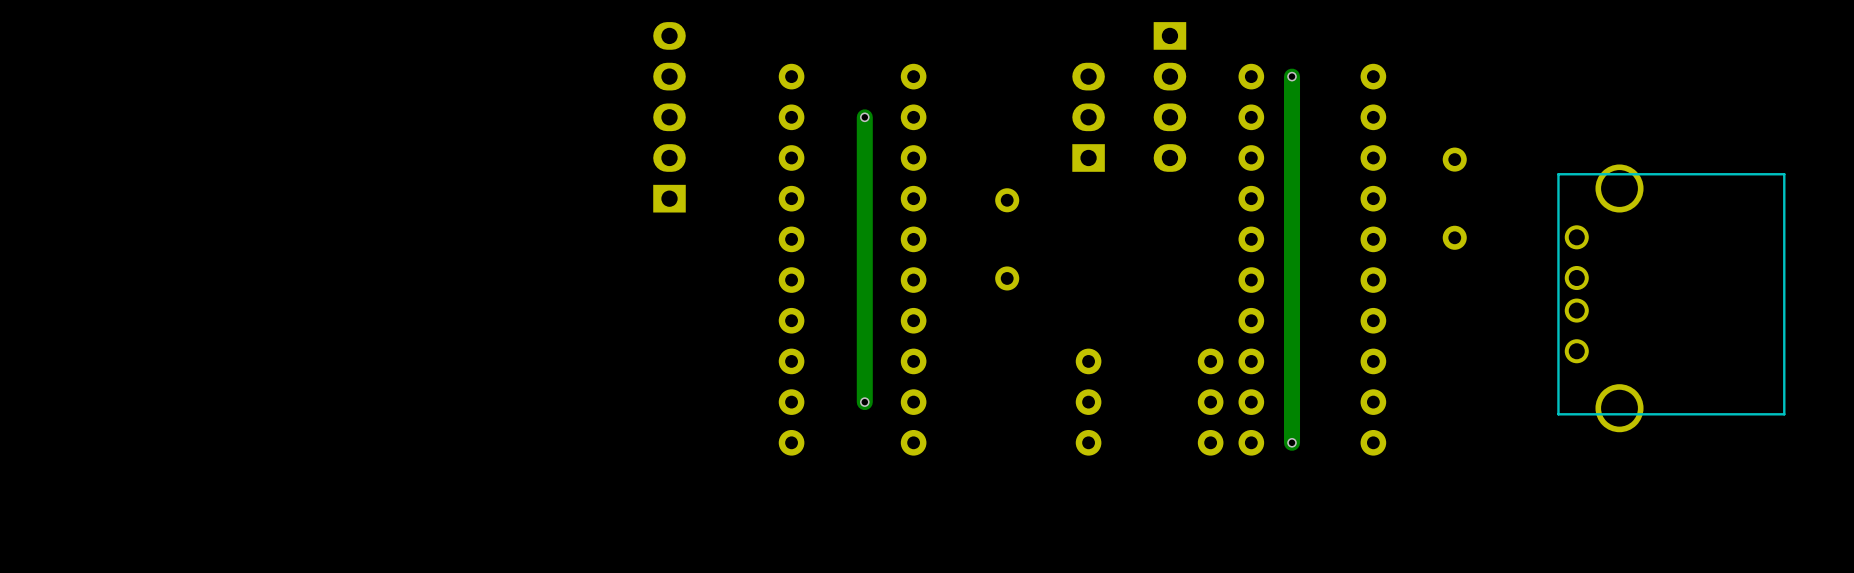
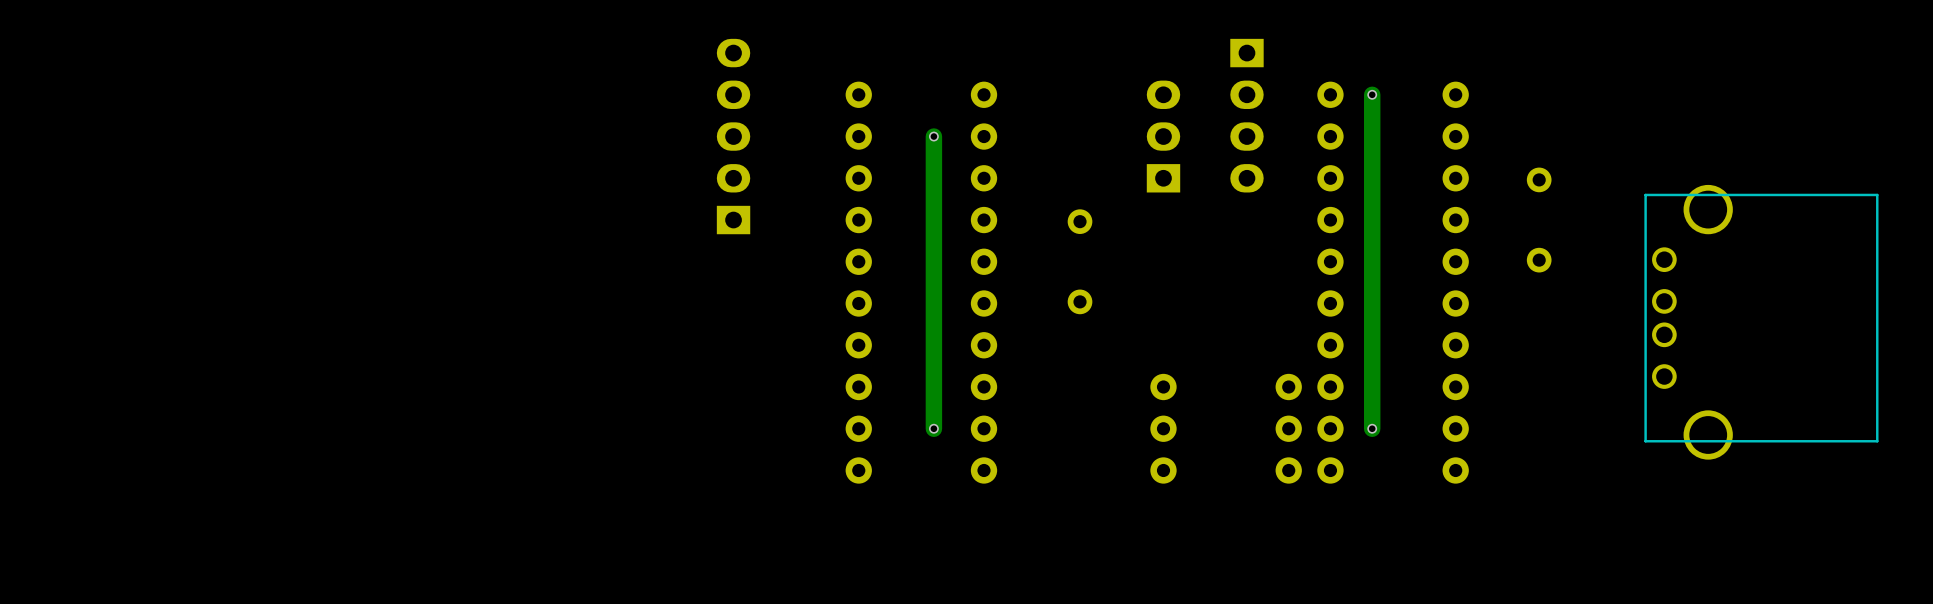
track: (1292, 402) (1292, 442) -> none
via position: (1292, 442) -> (1372, 428)

